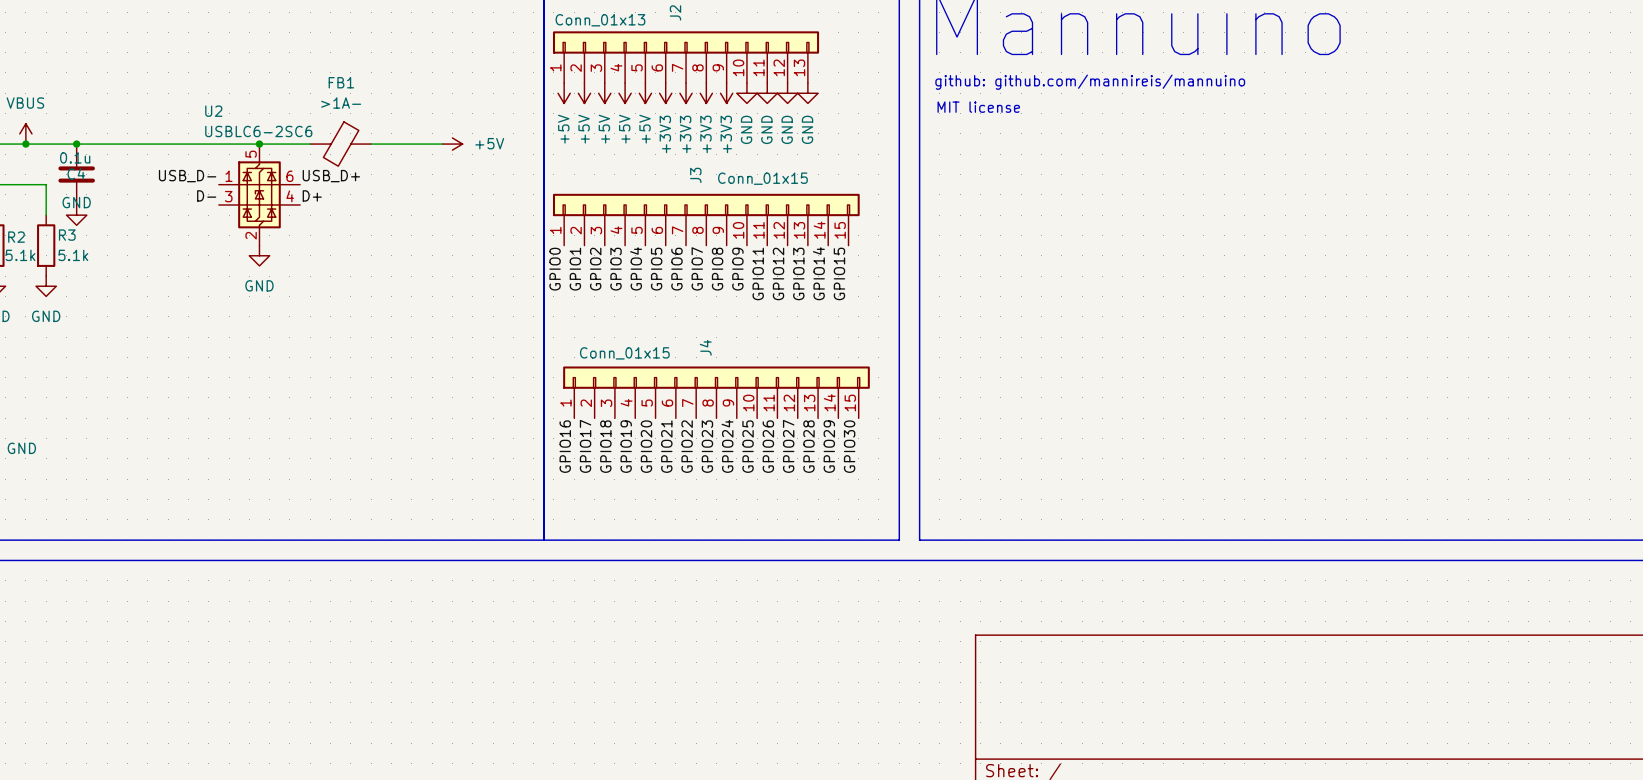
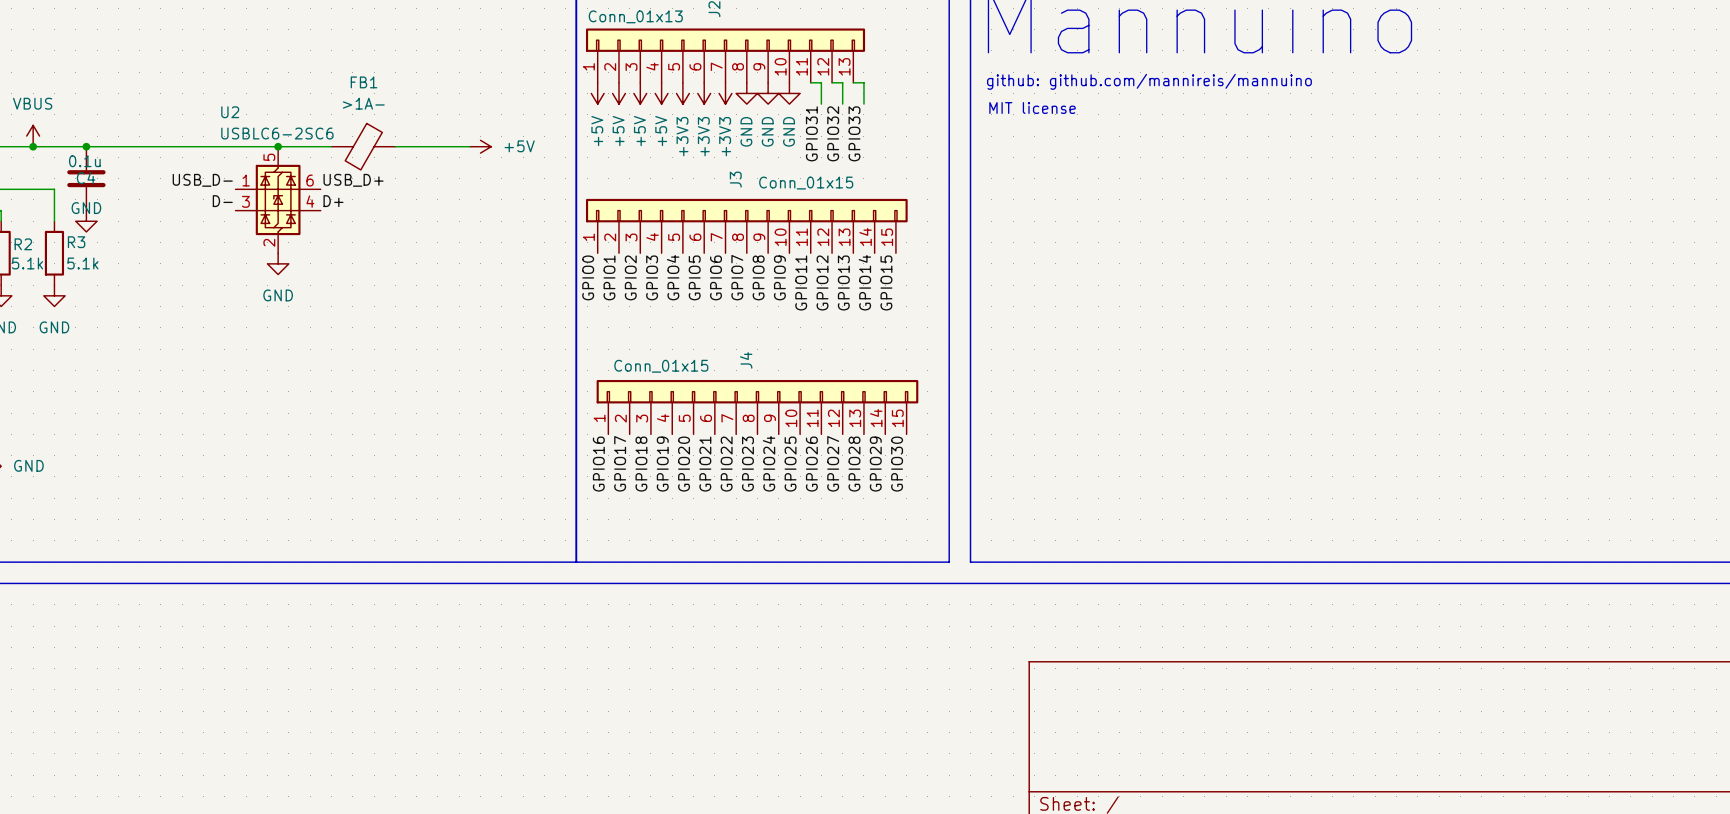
wire: none -> (810, 82) (821, 82) (821, 104)
wire: none -> (832, 82) (842, 82) (842, 104)
wire: none -> (853, 82) (863, 82) (863, 104)
power symbol: +5V (645, 93) -> +3V3 (682, 93)
power symbol: +3V3 (706, 93) -> GND (746, 93)
power symbol: +3V3 (726, 93) -> GND (768, 93)
power symbol: GND (767, 93) -> none
power symbol: GND (787, 93) -> none
power symbol: GND (807, 93) -> none
label: none -> GPIO31 (811, 133)
label: none -> GPIO32 (833, 133)
label: none -> GPIO33 (854, 133)

